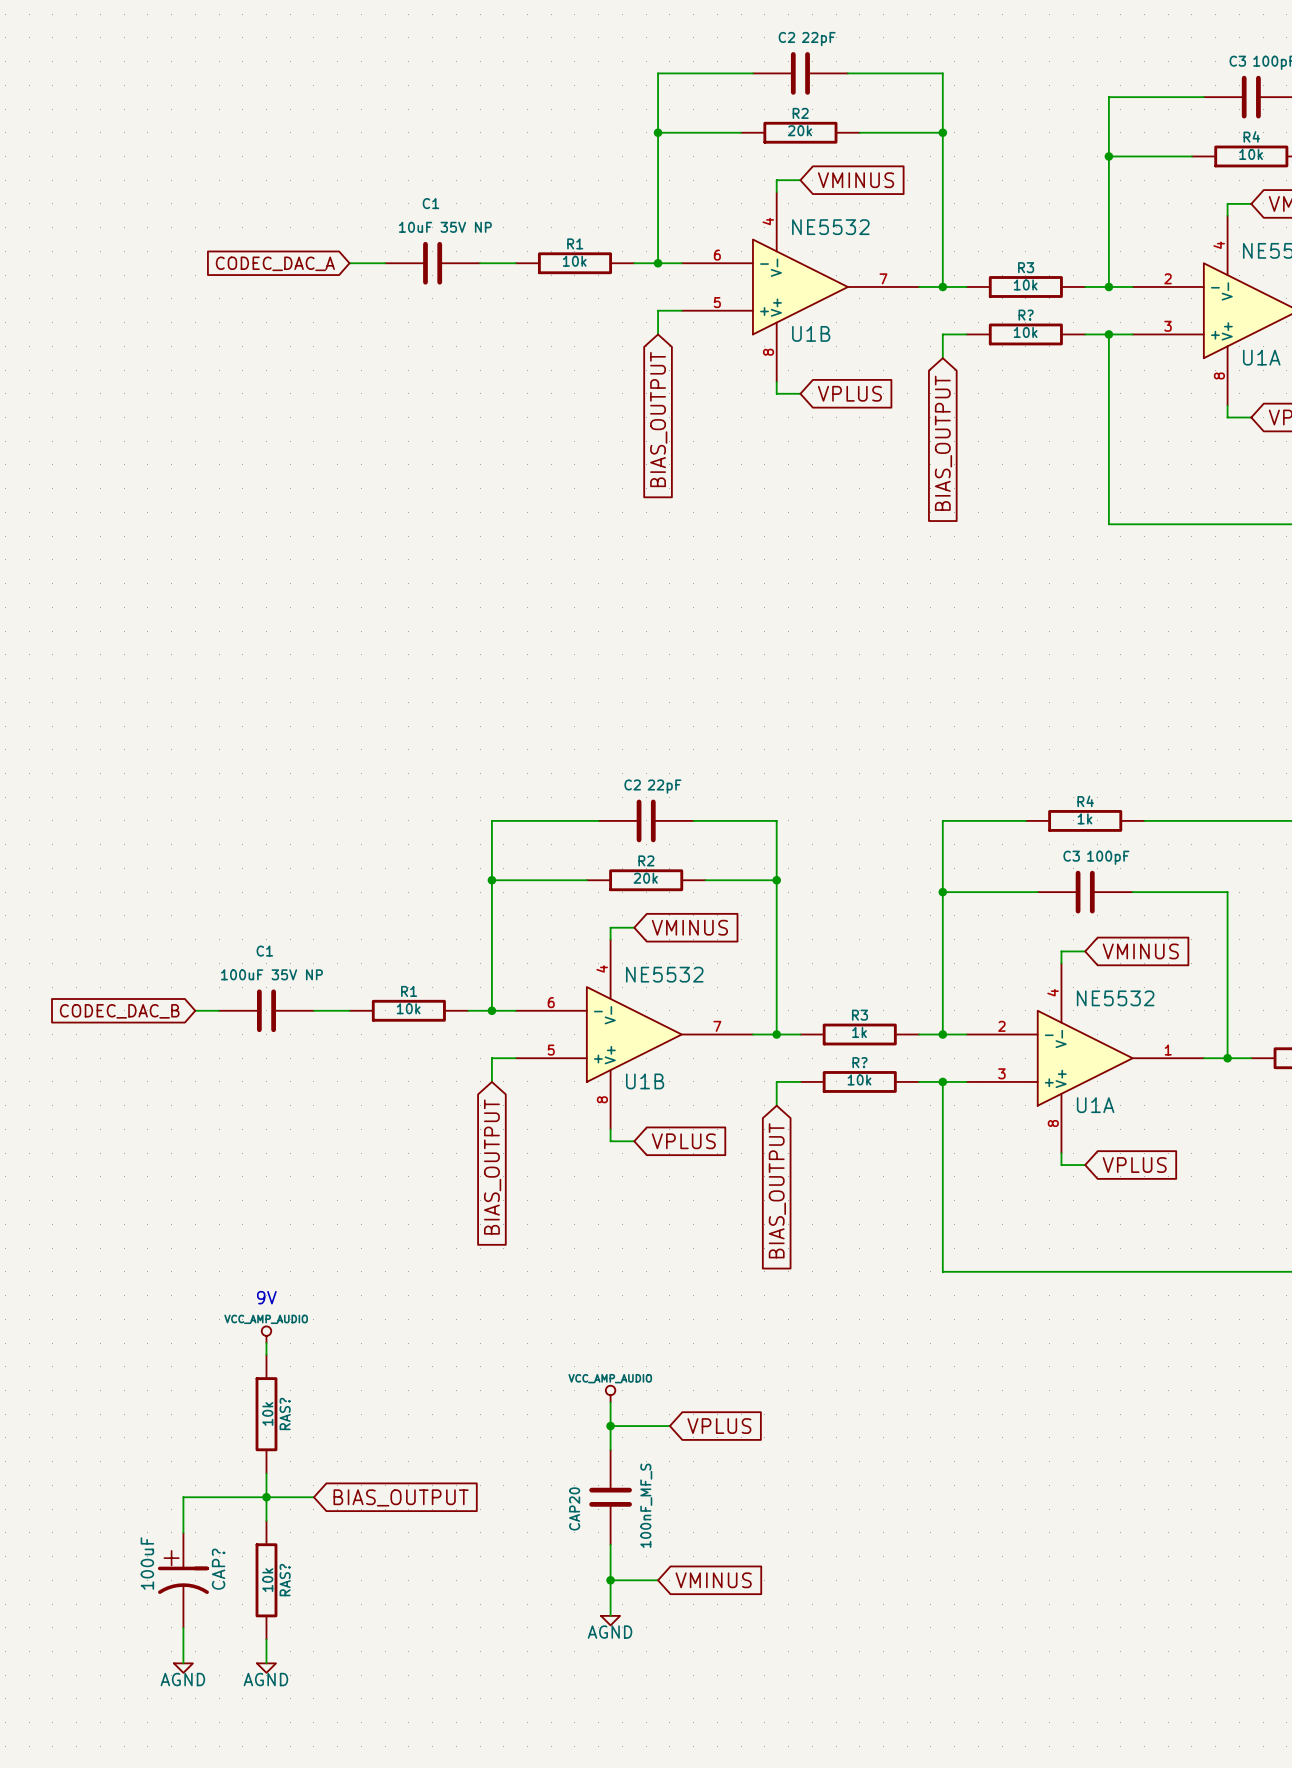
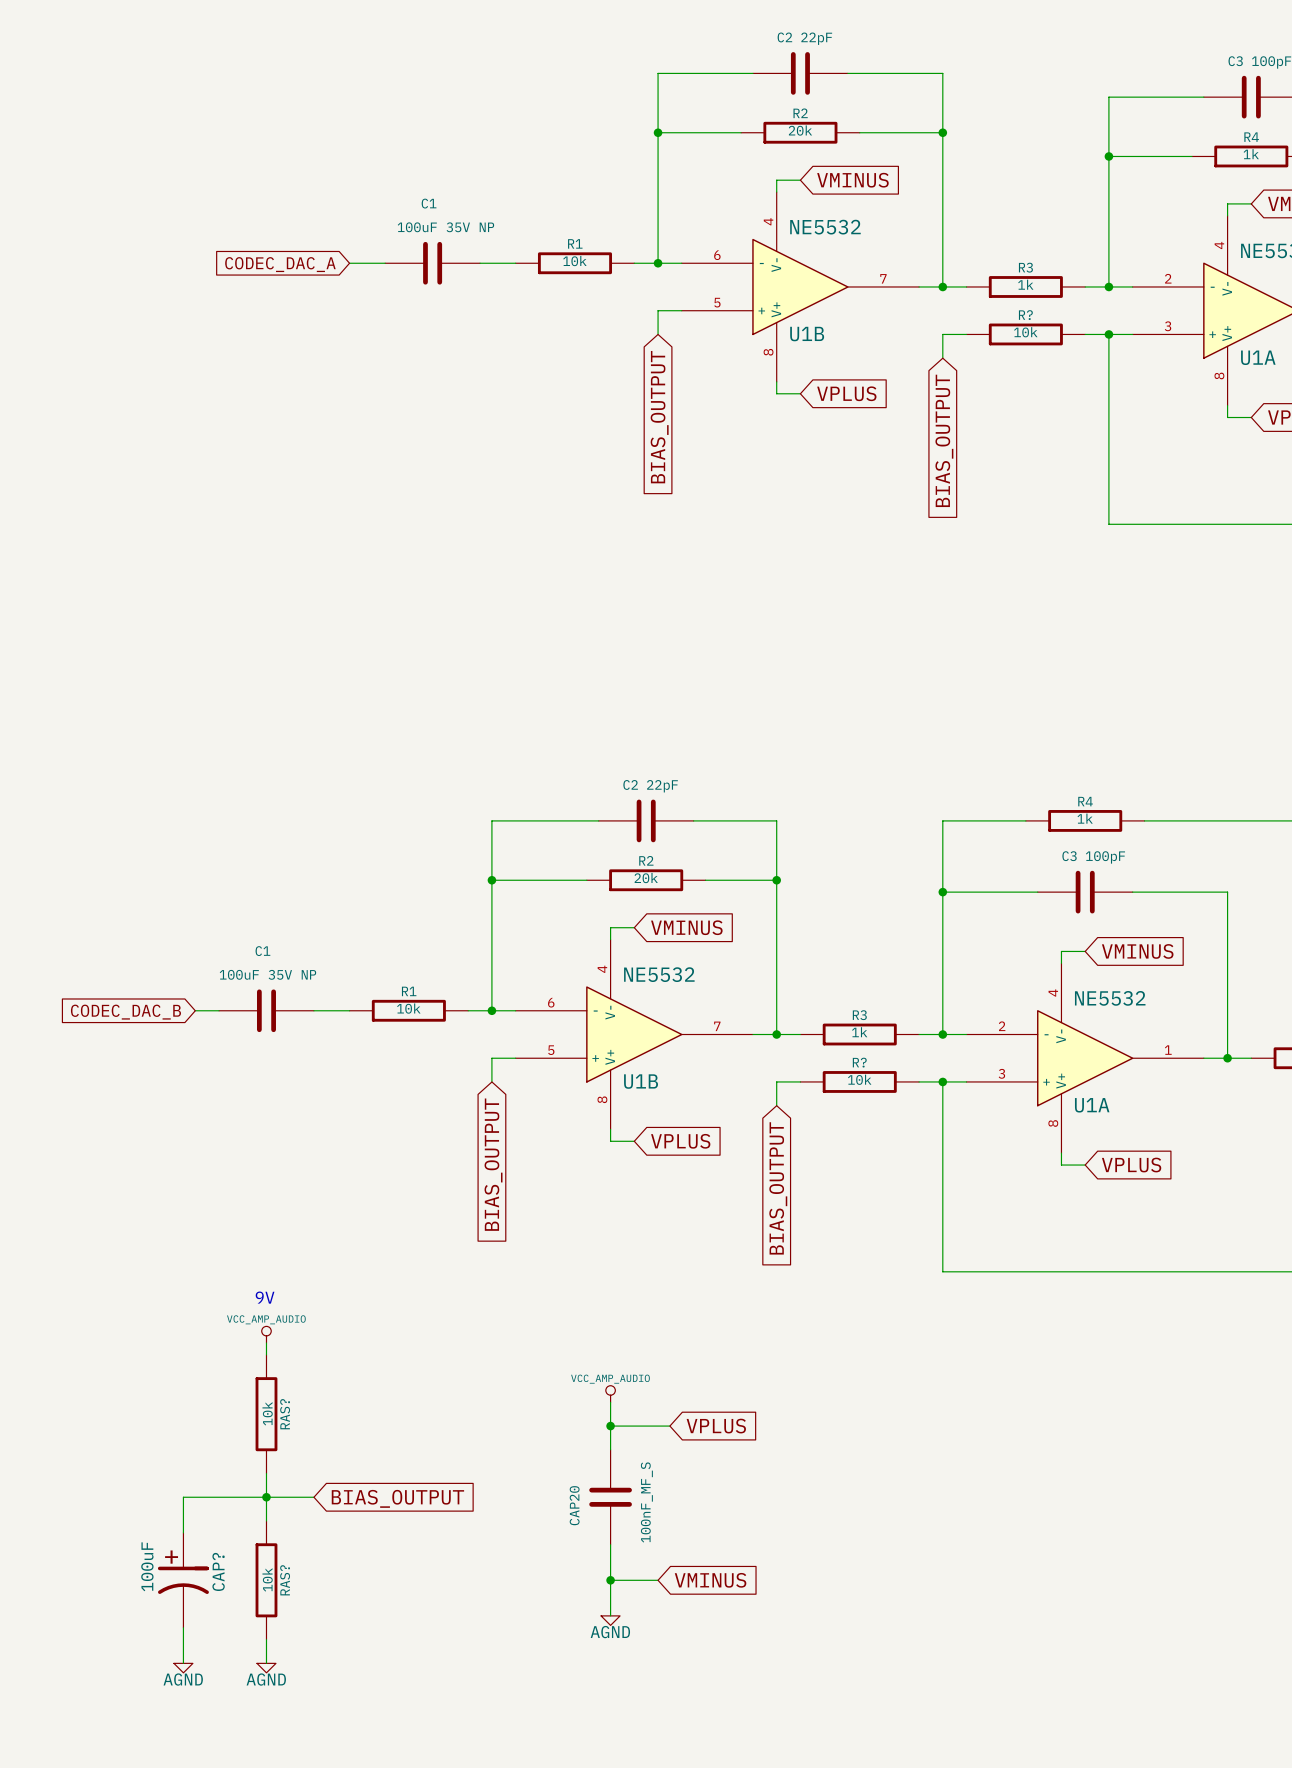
R4 value: 10k (1251, 154) -> 1k (1251, 154)
C1 value: 10uF 35V NP (445, 227) -> 100uF 35V NP (445, 227)
R3 value: 10k (1025, 284) -> 1k (1025, 284)

